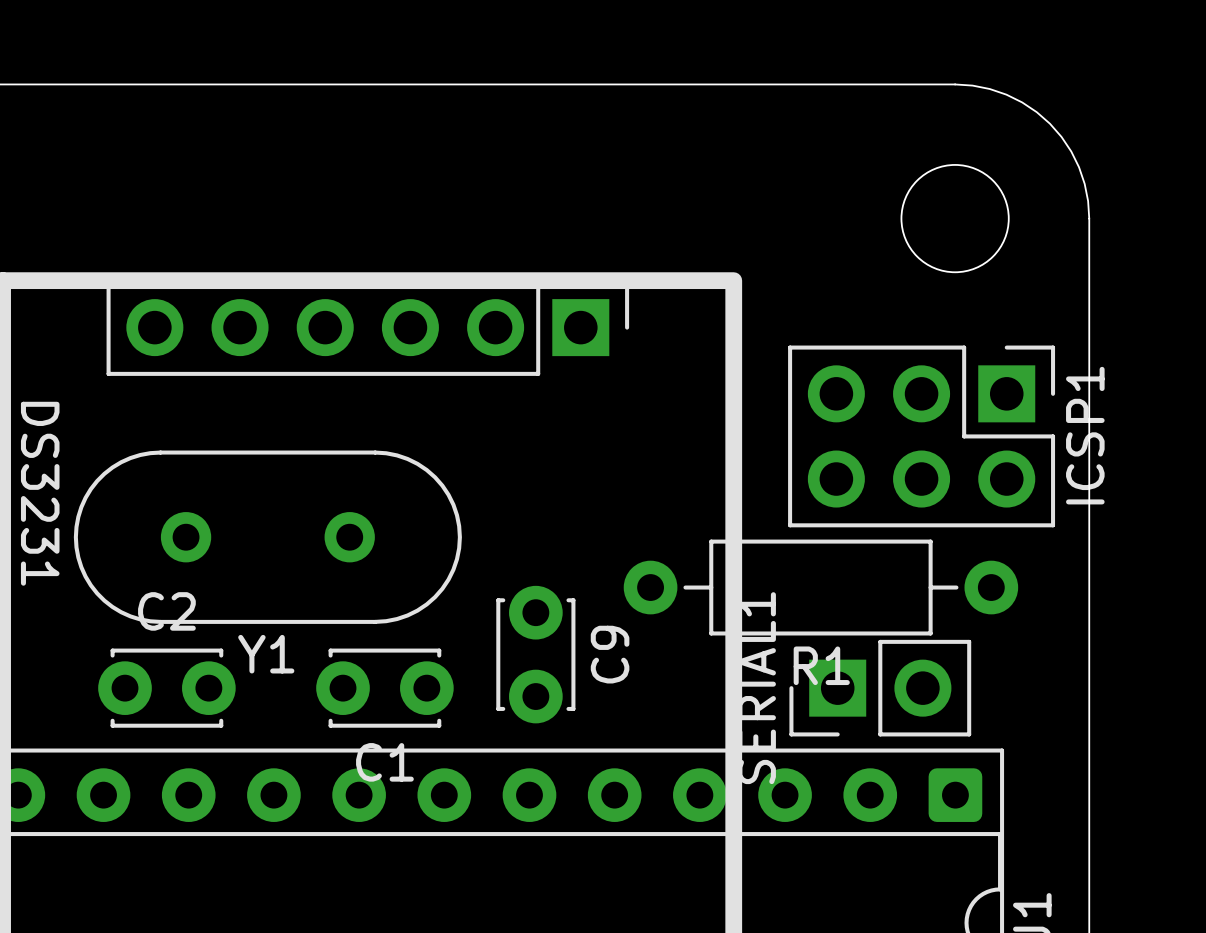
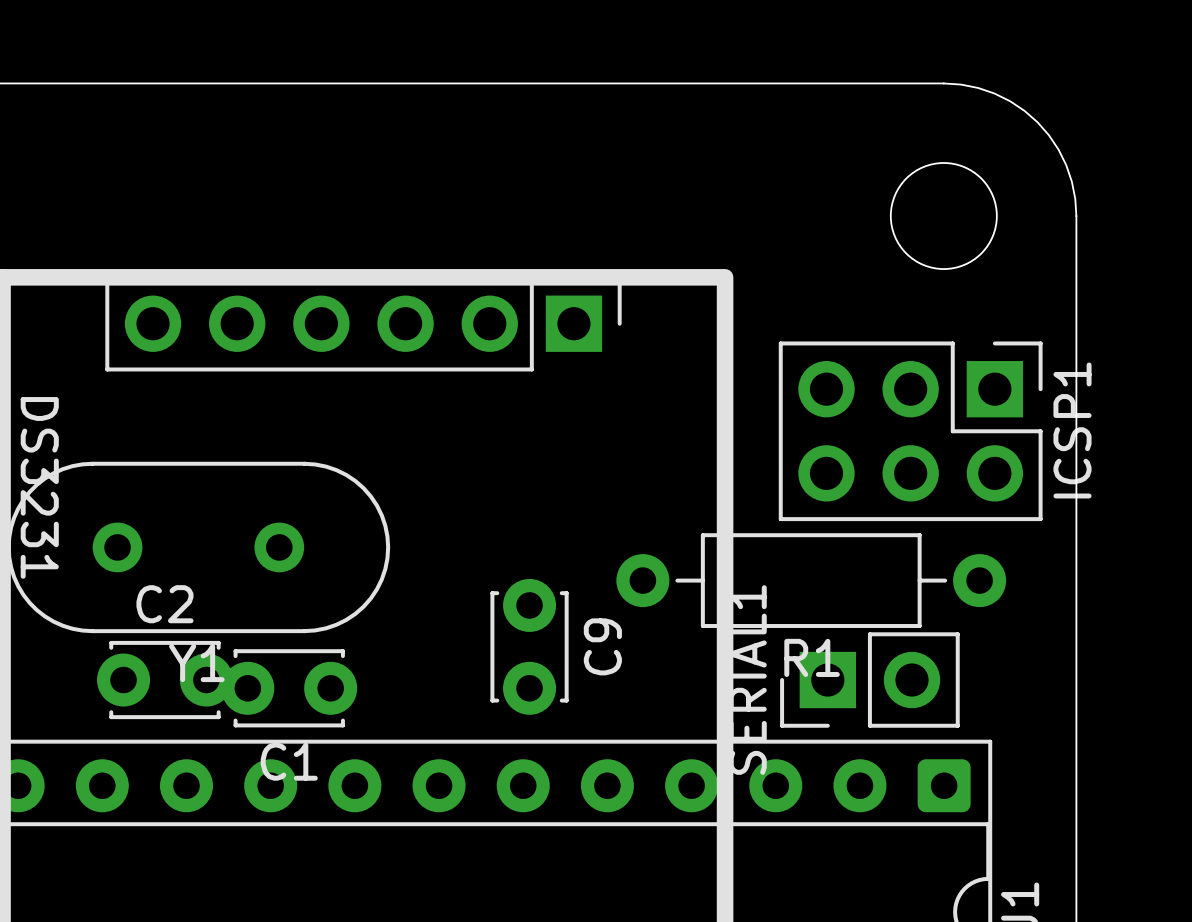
Y1 position: (267, 537) -> (198, 547)
C1 position: (384, 688) -> (289, 688)

